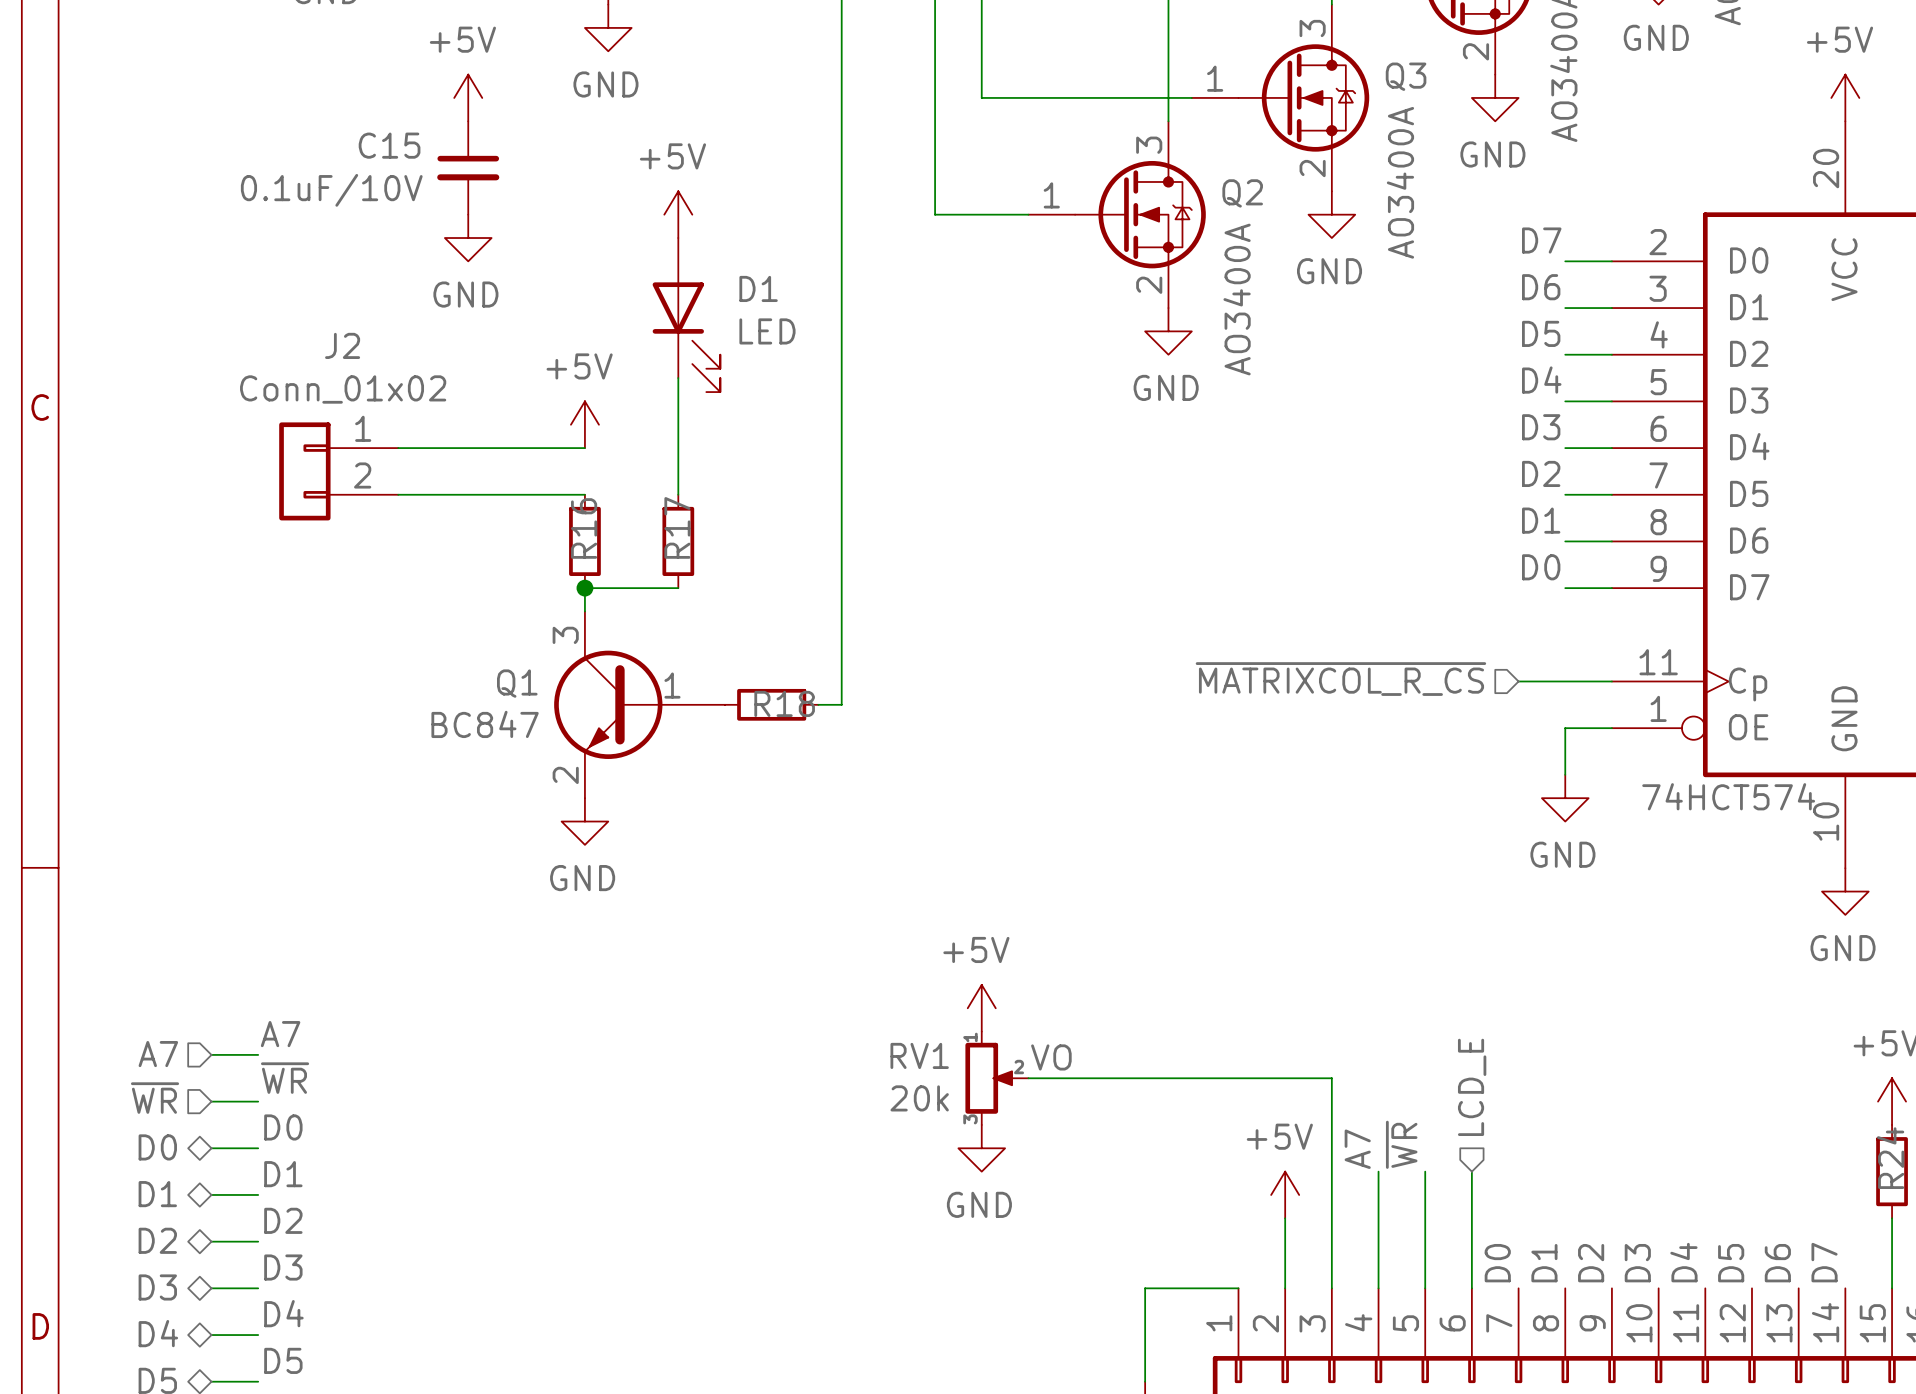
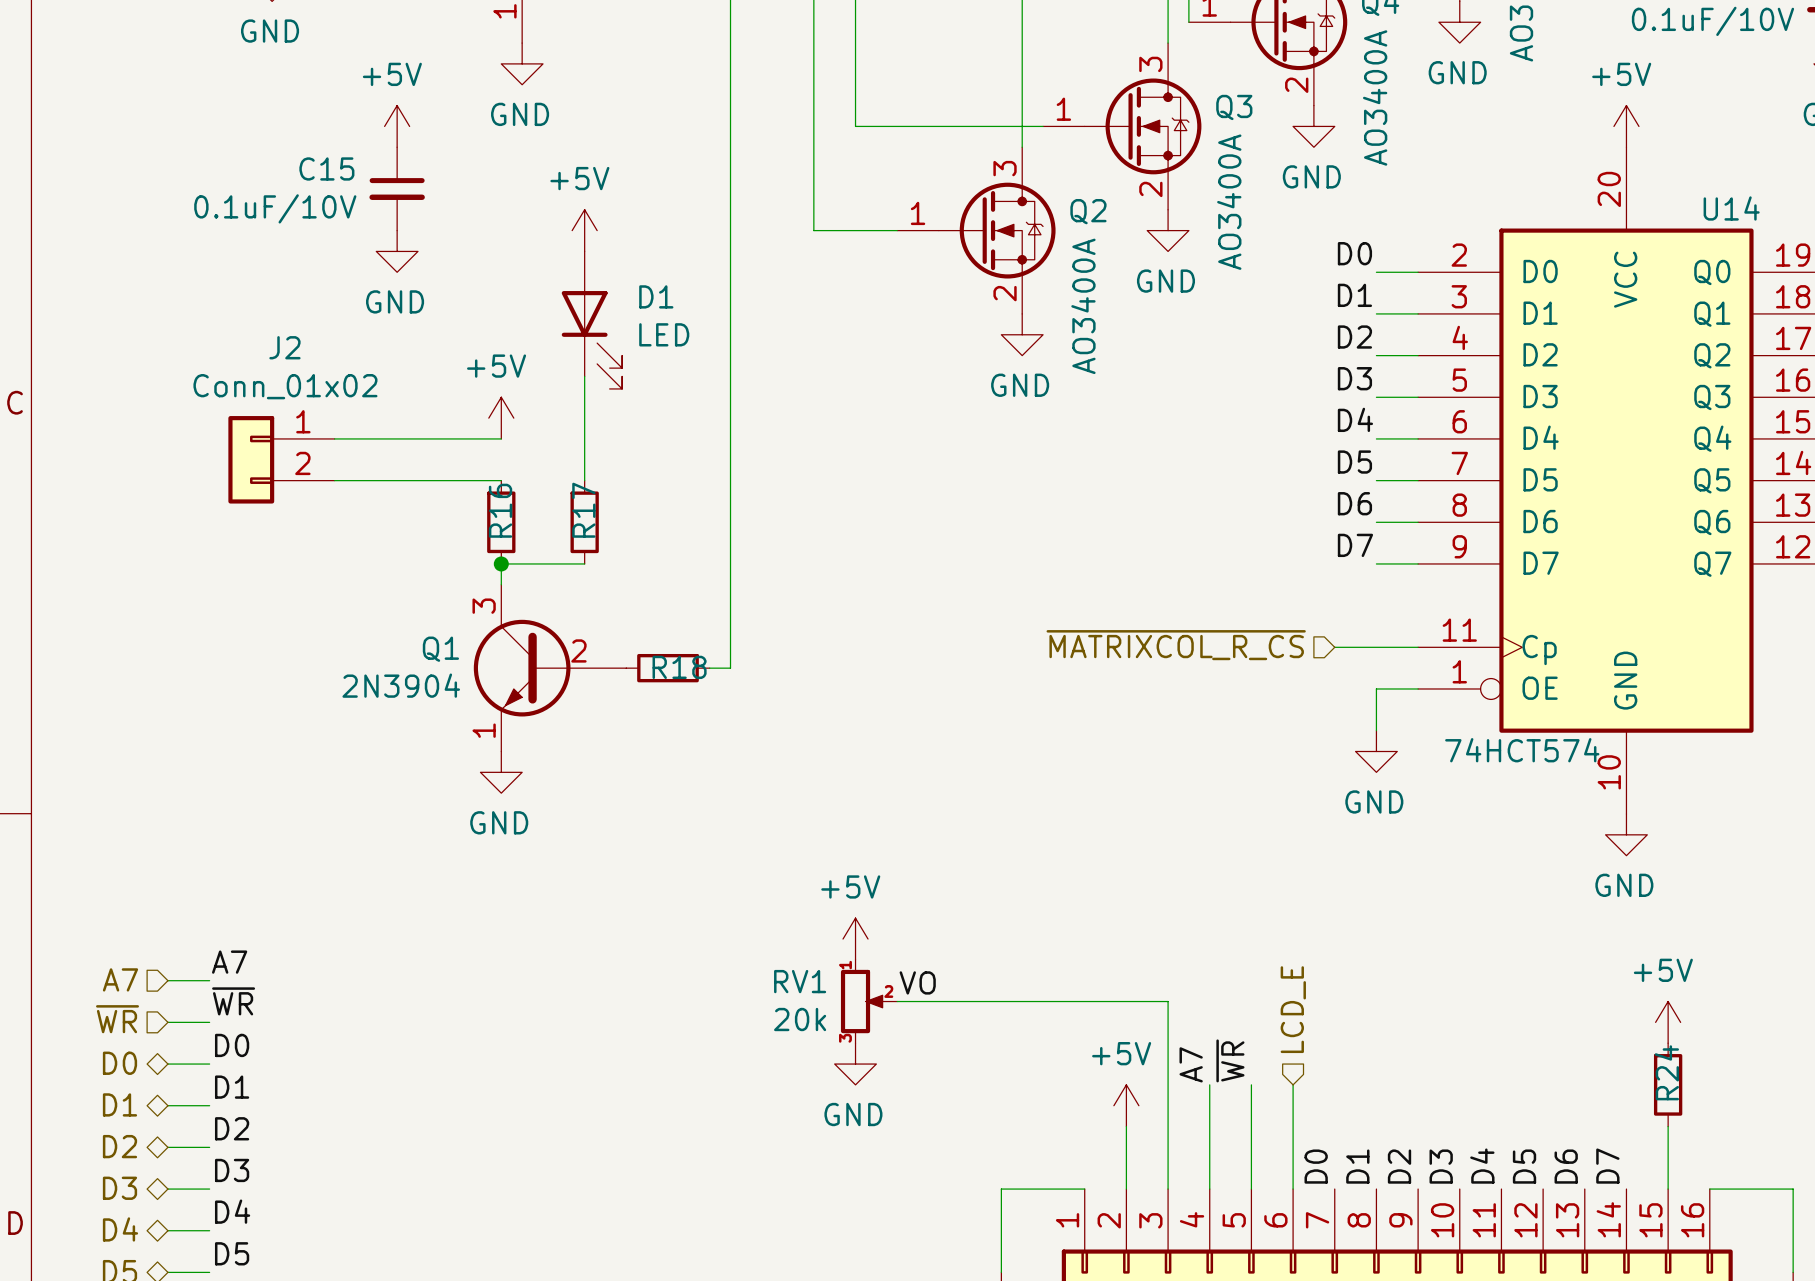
label: D7 (1541, 240) -> D0 (1354, 253)
label: D6 (1541, 287) -> D1 (1354, 295)
label: D5 (1541, 333) -> D2 (1354, 337)
label: D4 (1541, 380) -> D3 (1354, 378)
label: D3 (1541, 427) -> D4 (1355, 419)
label: D2 (1541, 473) -> D5 (1354, 462)
label: D1 (1541, 520) -> D6 (1354, 503)
label: D0 (1541, 567) -> D7 (1355, 545)
Q1 pin number: 1 (672, 685) -> 2 (578, 650)
Q1 value: BC847 (485, 724) -> 2N3904 (401, 685)
Q1 pin number: 2 (565, 775) -> 1 (484, 730)

